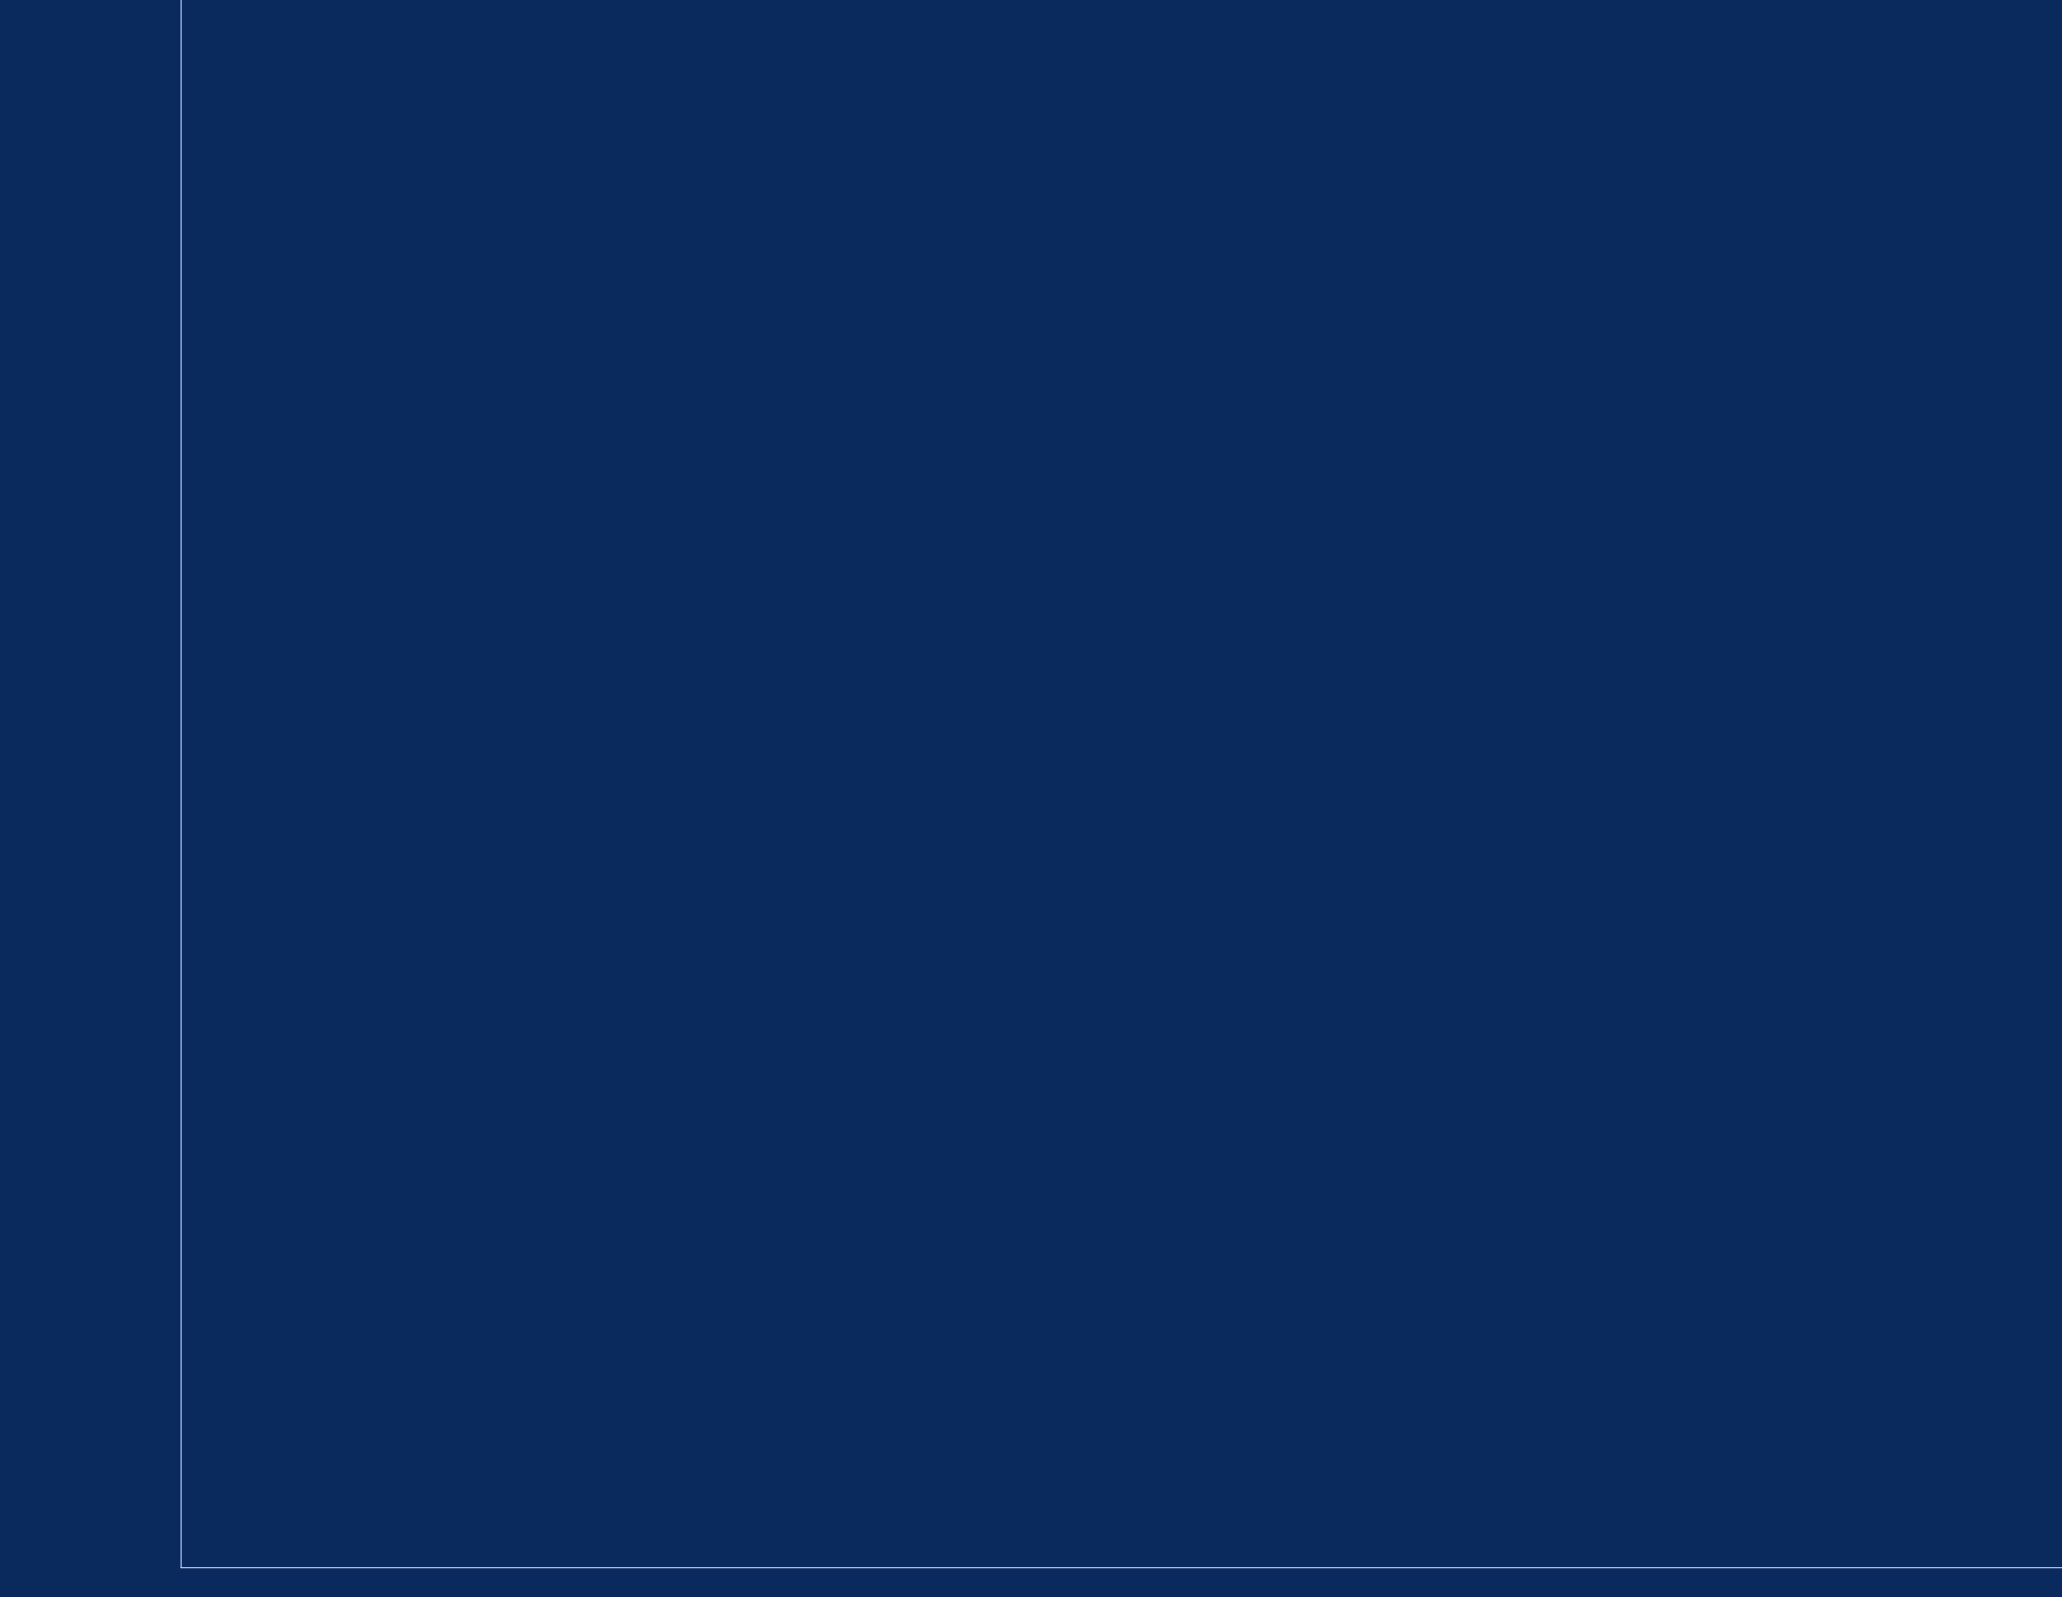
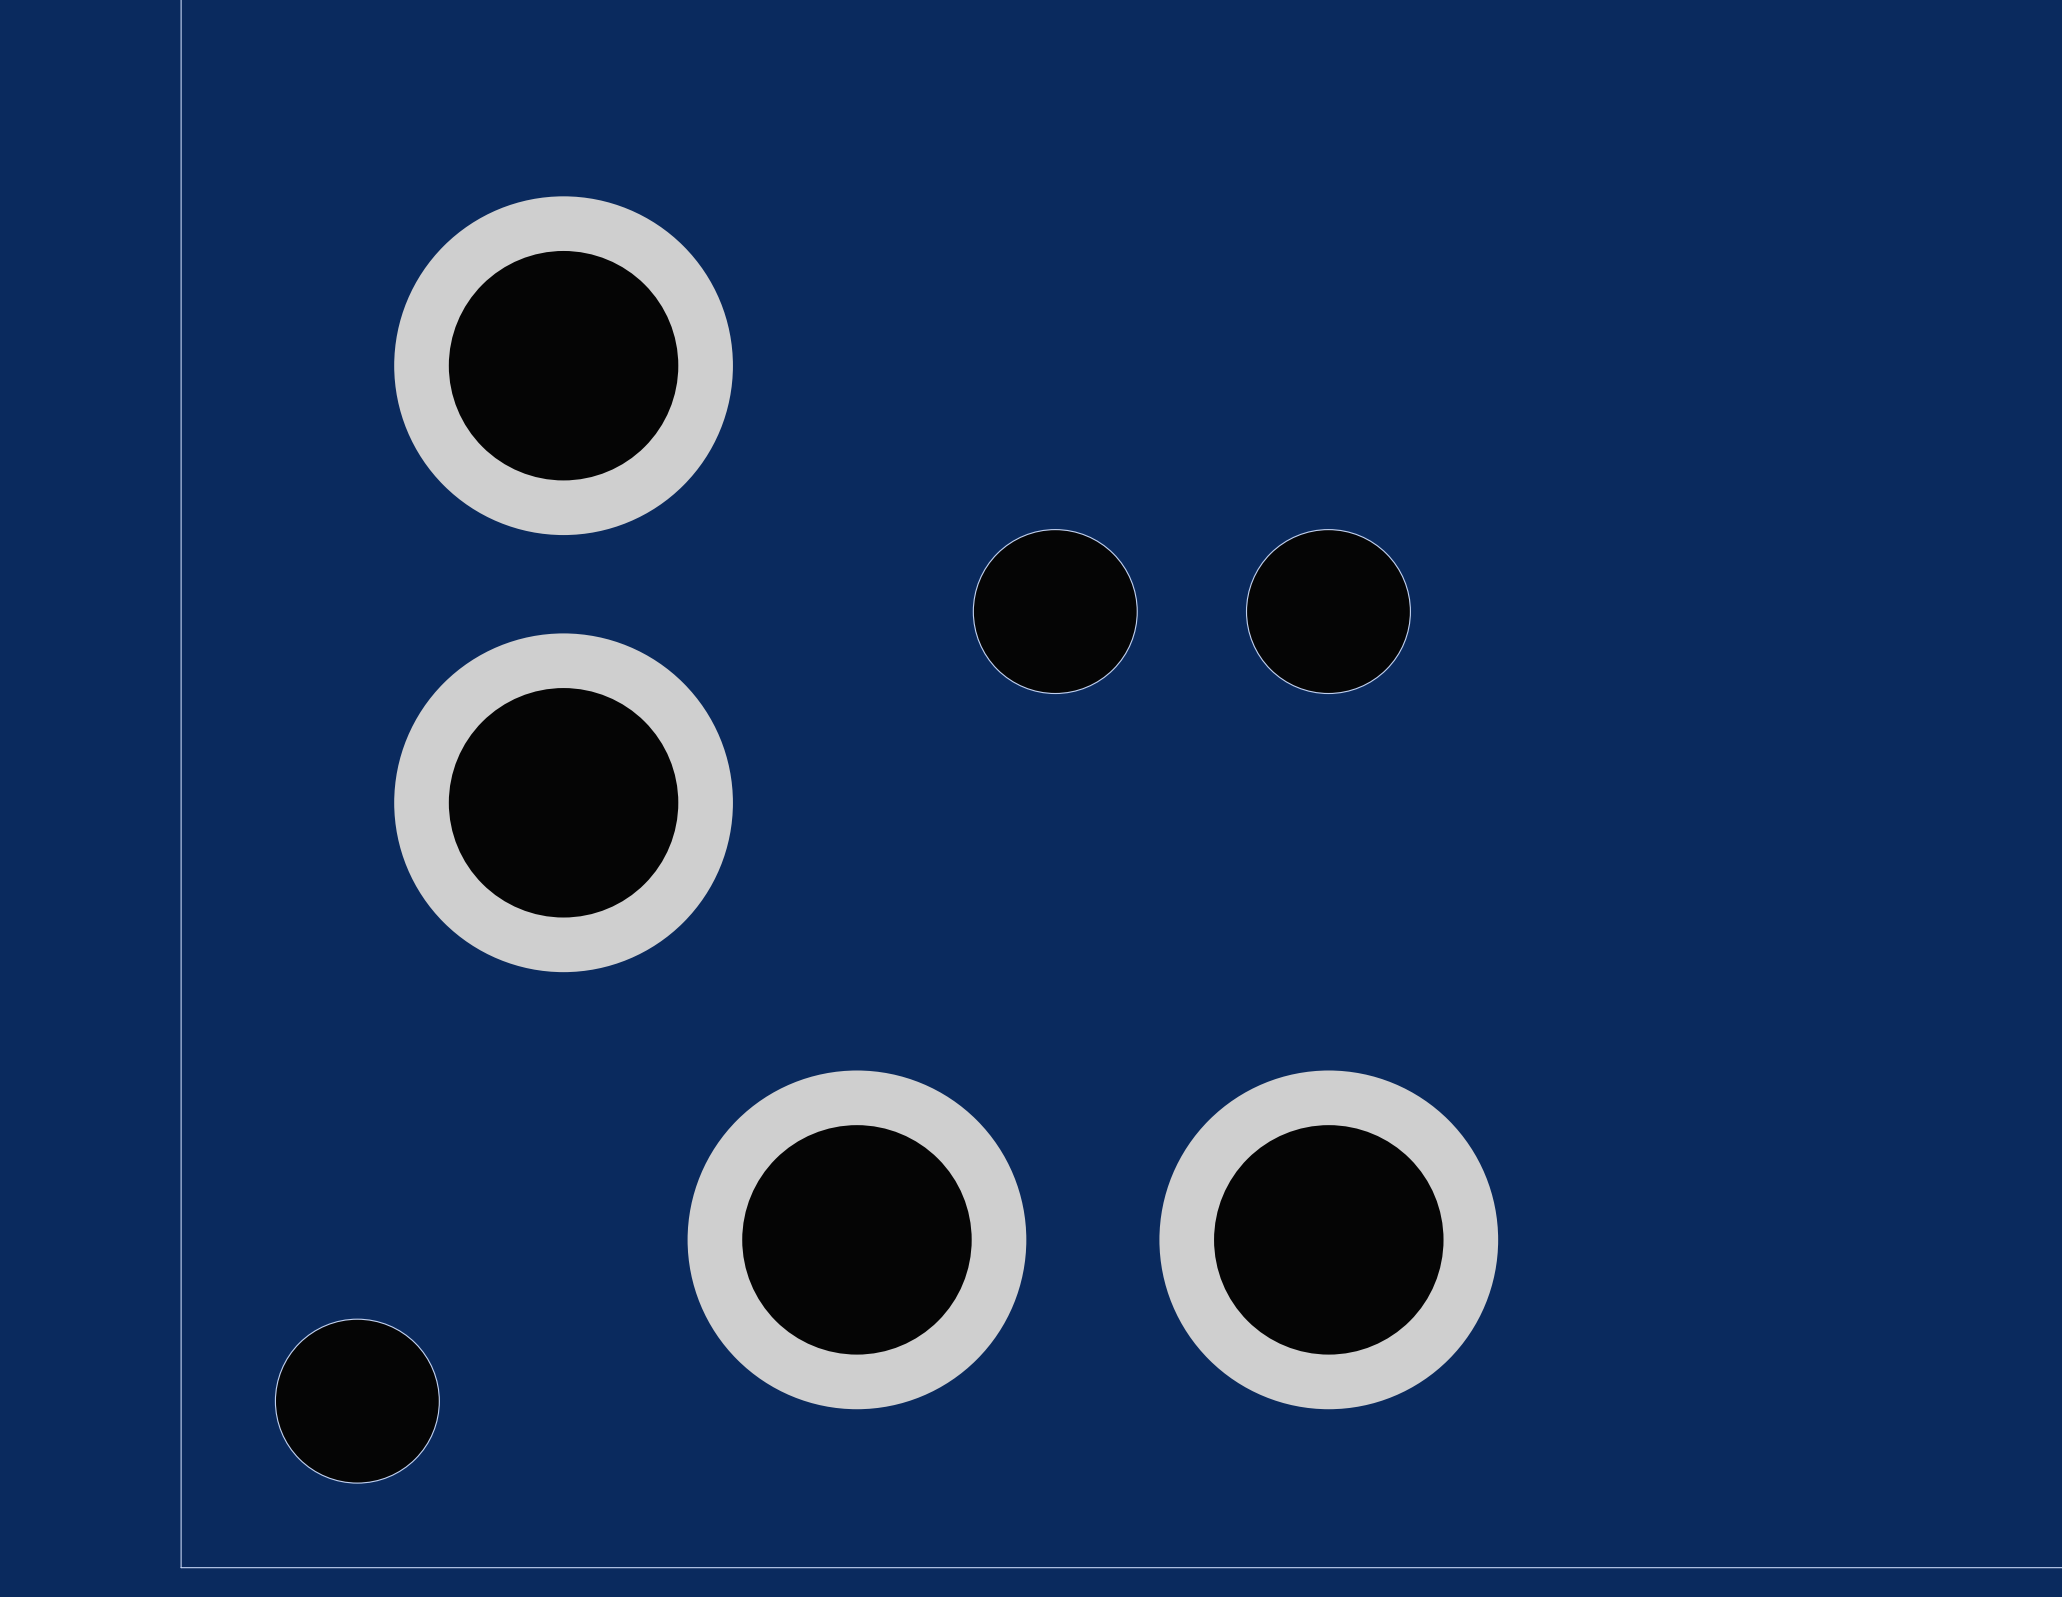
part: none -> (563, 365)
hole: none -> (1055, 611)
hole: none -> (1328, 611)
part: none -> (563, 802)
part: none -> (856, 1239)
part: none -> (1328, 1239)
hole: none -> (357, 1401)

